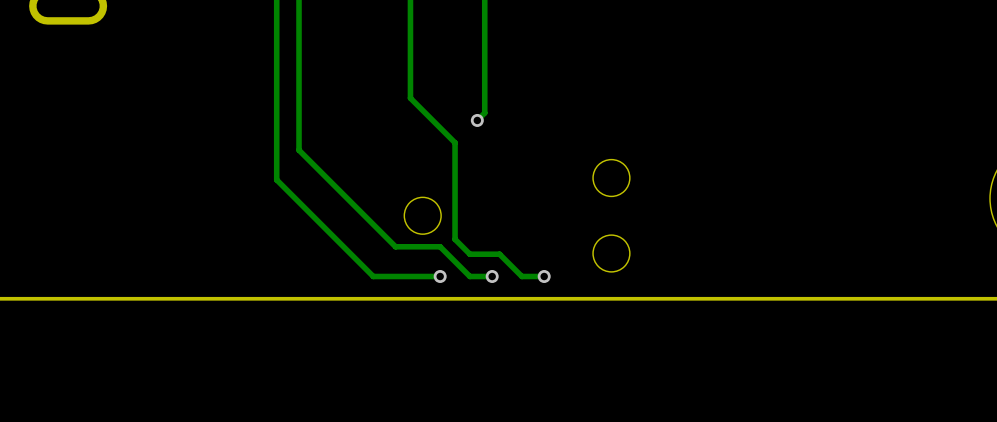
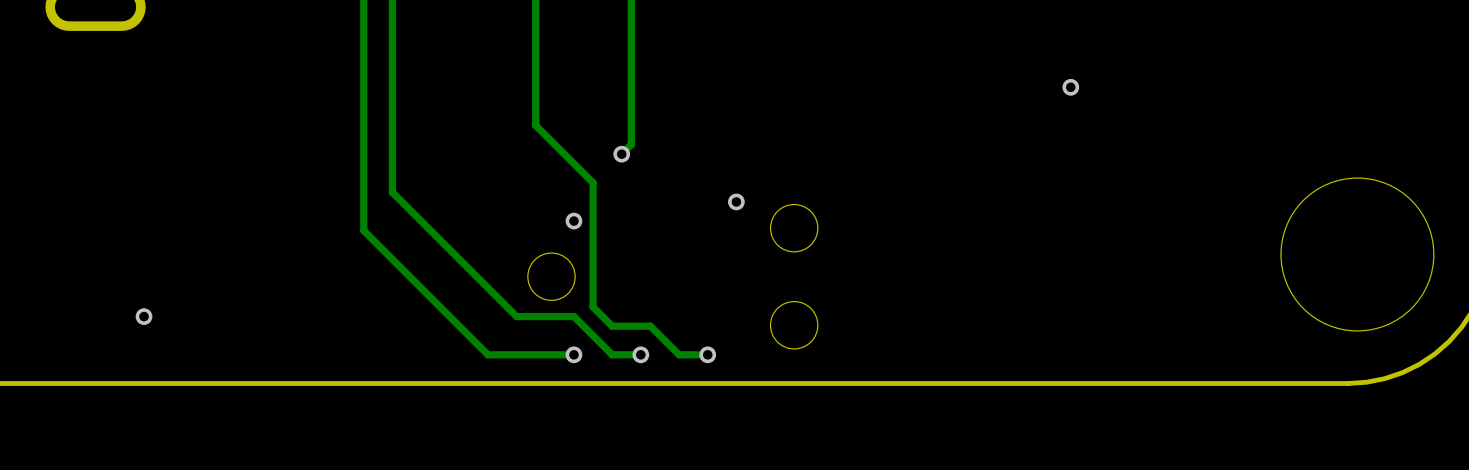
via: none -> (1070, 87)
via: none -> (736, 201)
via: none -> (573, 221)
via: none -> (144, 316)

